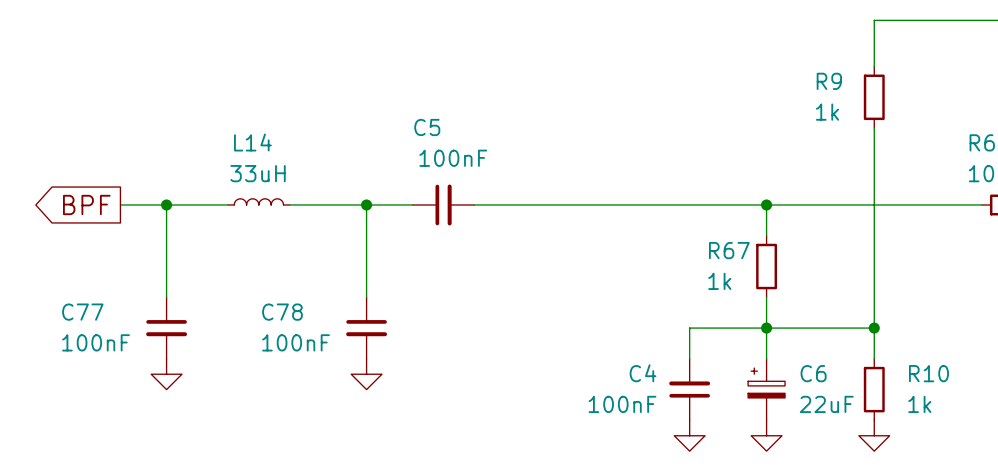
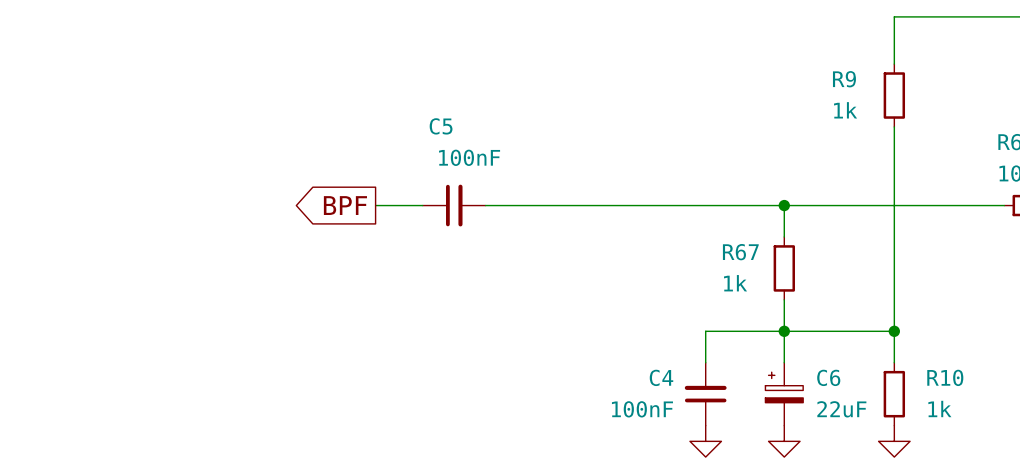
L14: 33uH (258, 201) -> none
global label position: BPF (86, 204) -> BPF (345, 205)
wire: (120, 204) (228, 204) -> none
wire: (166, 204) (166, 297) -> none
junction: (166, 204) -> none
wire: (289, 204) (366, 204) (366, 297) -> none
junction: (366, 204) -> none
C77: 100nF (166, 328) -> none
C78: 100nF (366, 328) -> none
power symbol: (166, 374) -> none
power symbol: (366, 374) -> none

